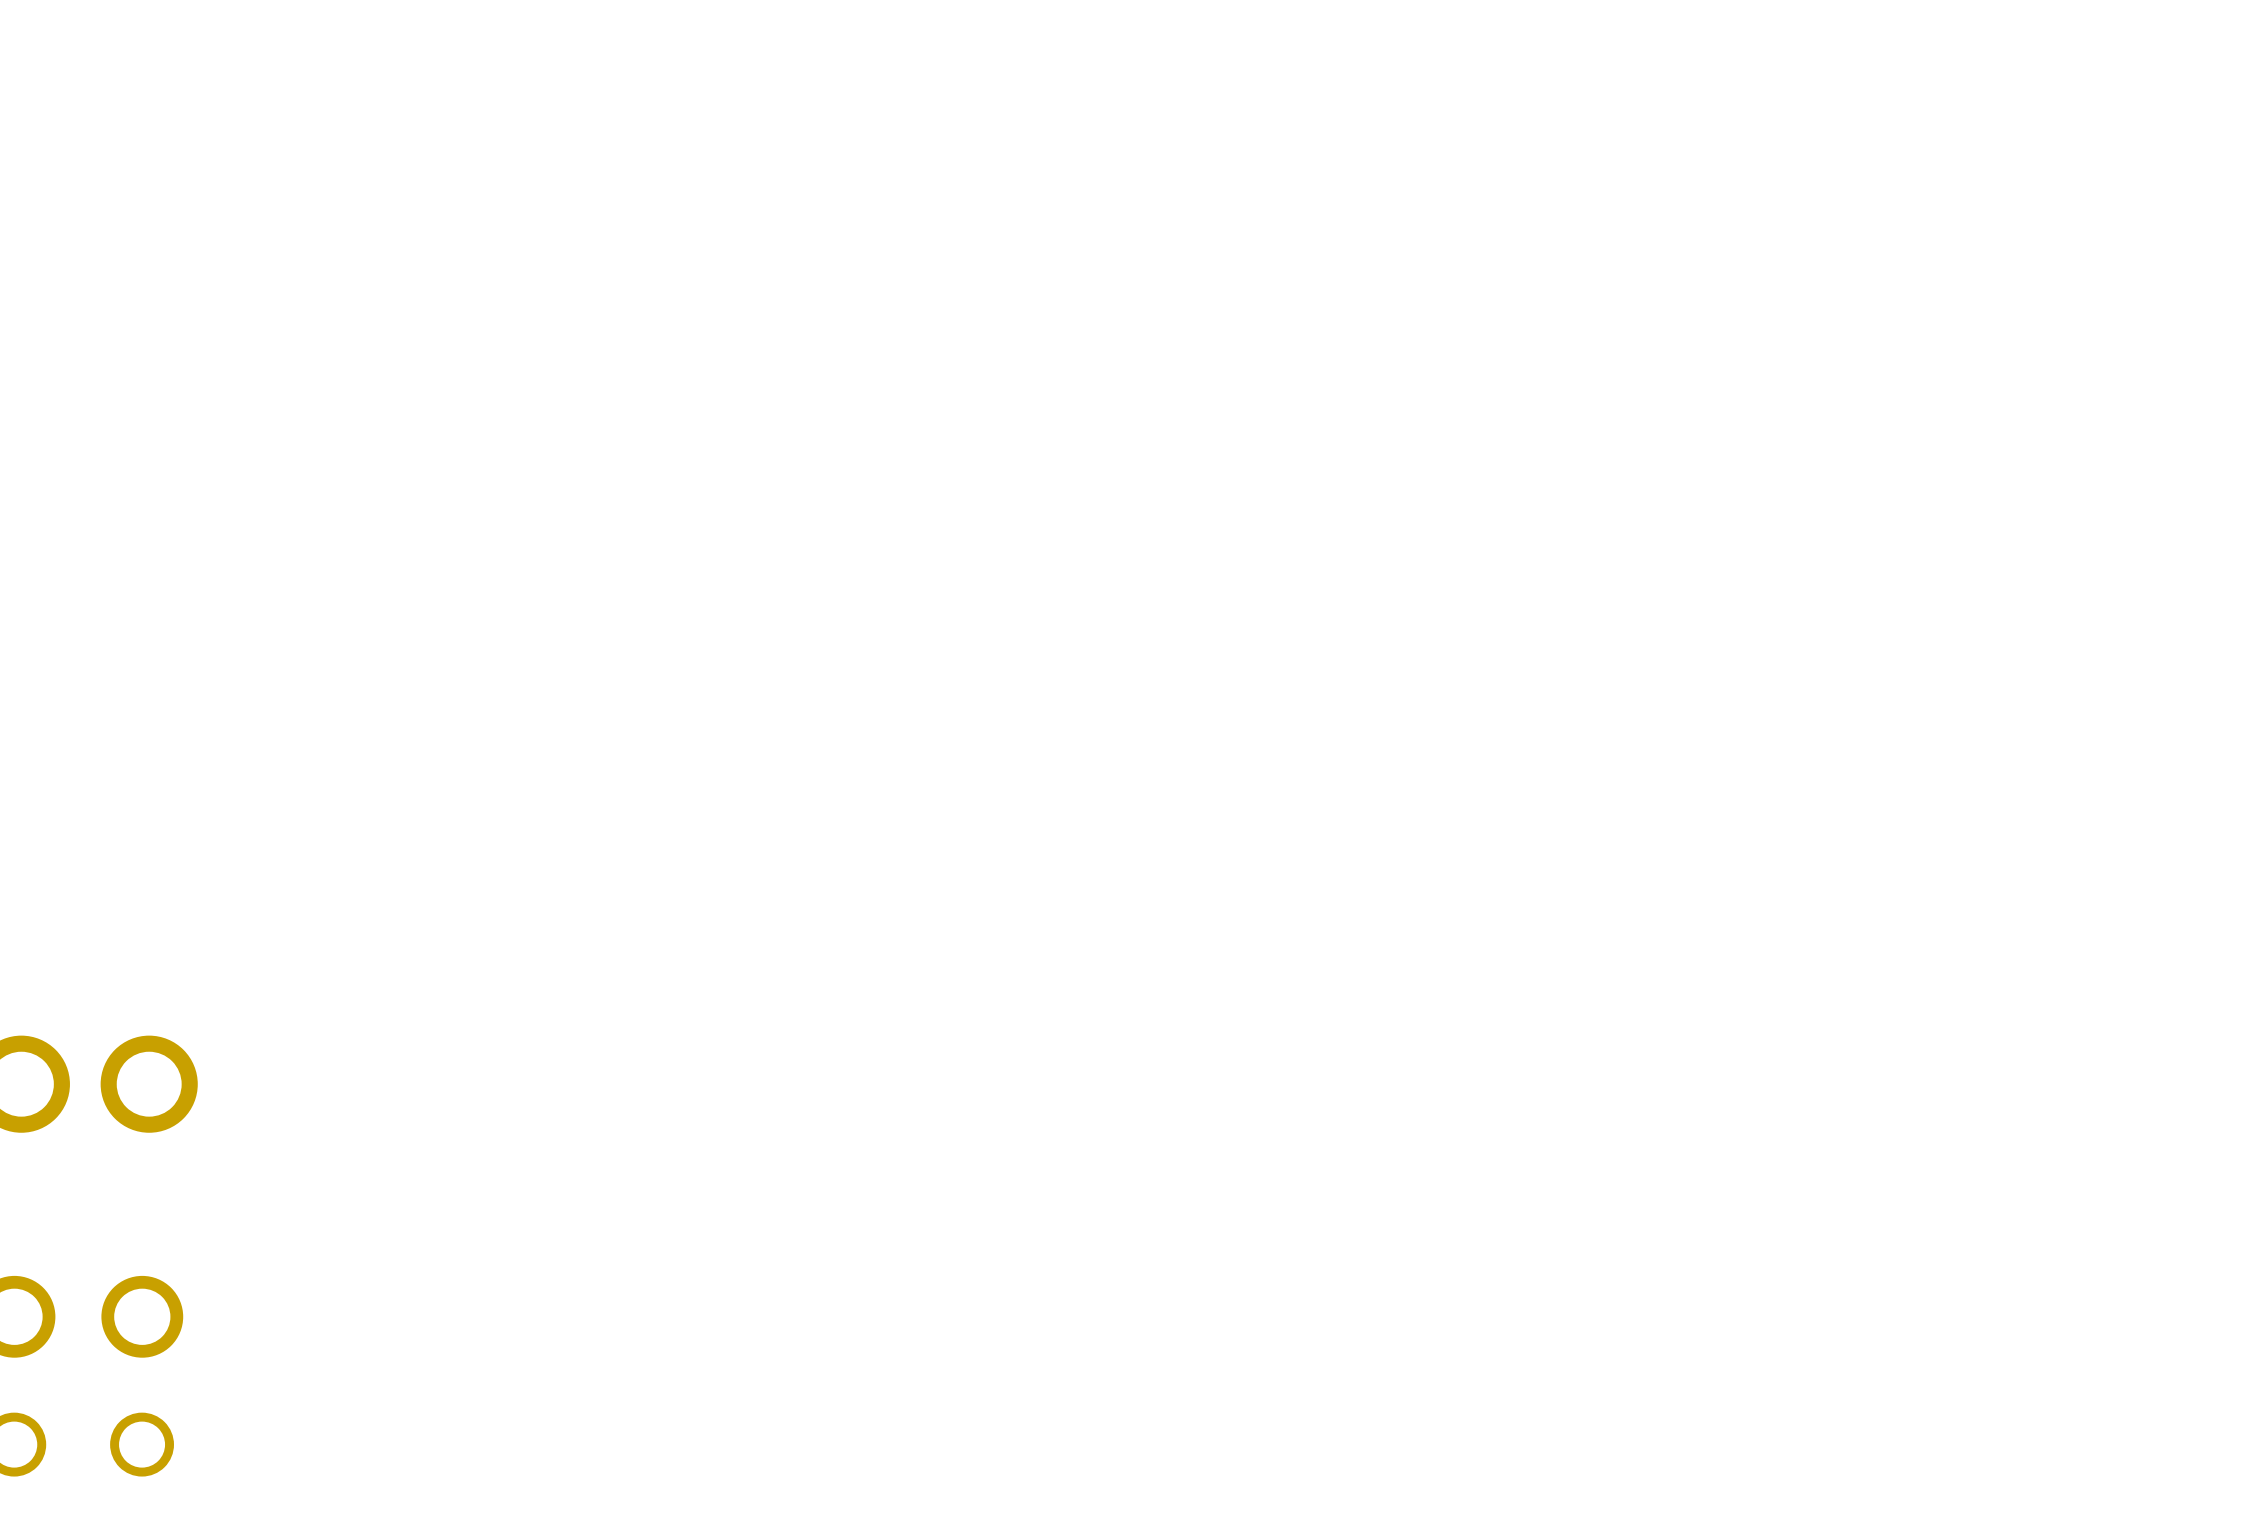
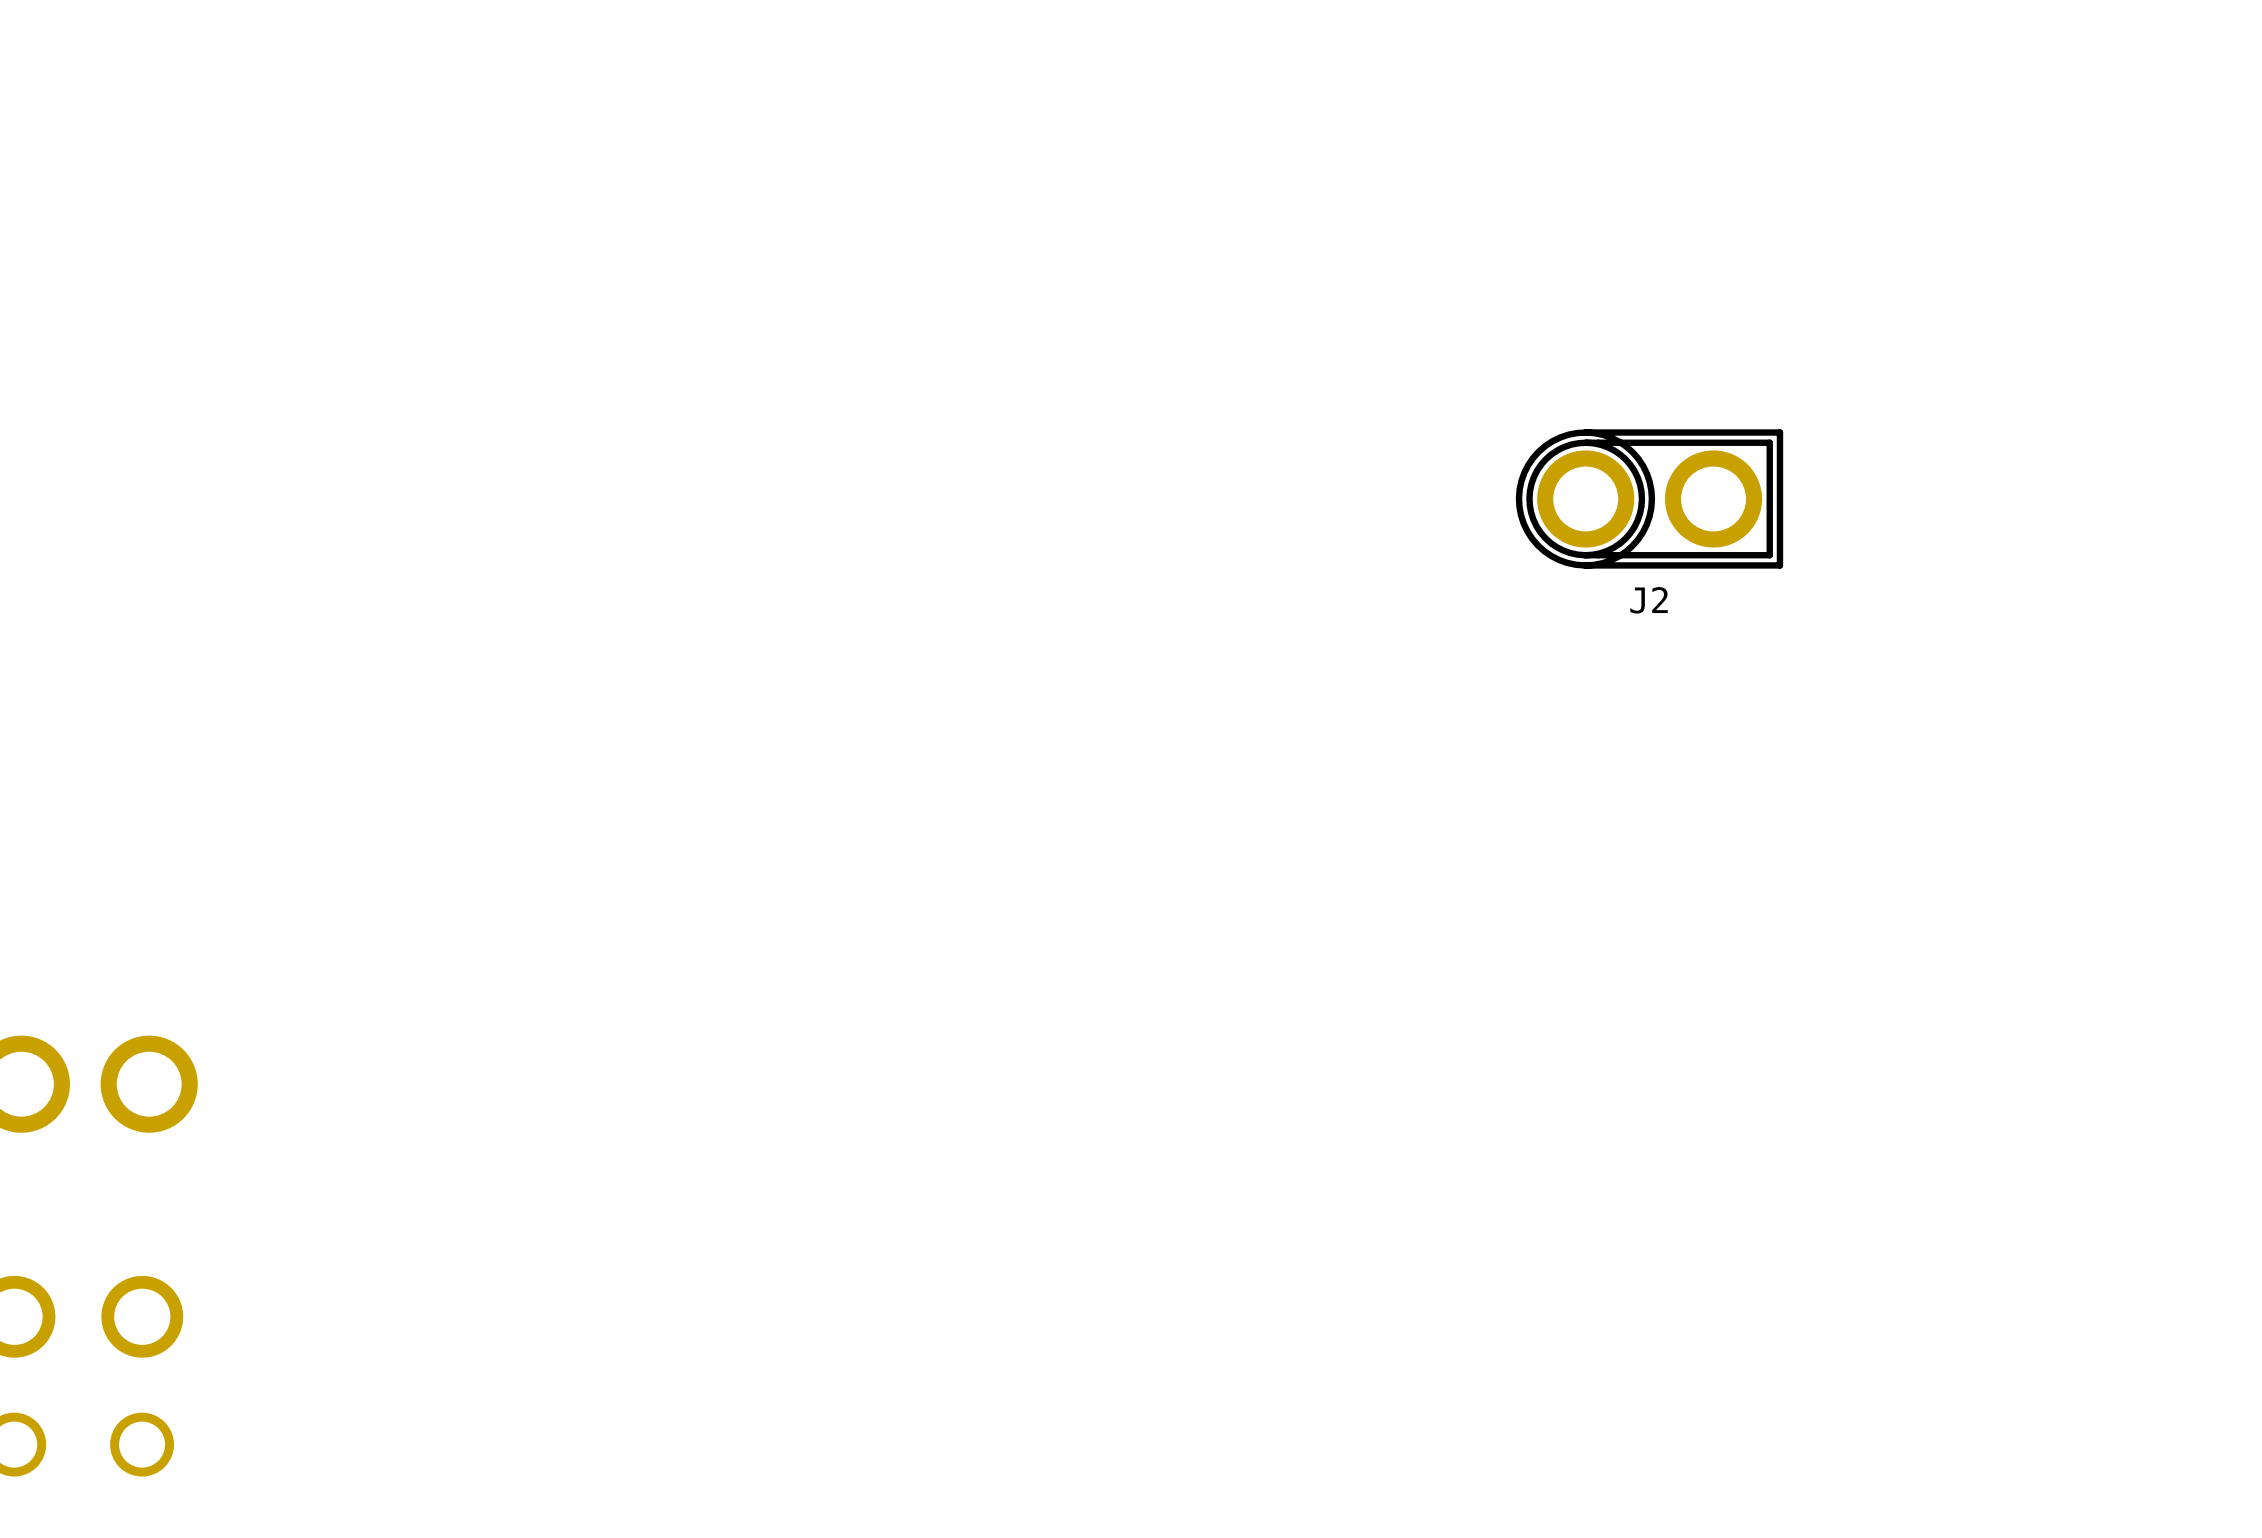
J2: none -> (1649, 498)

